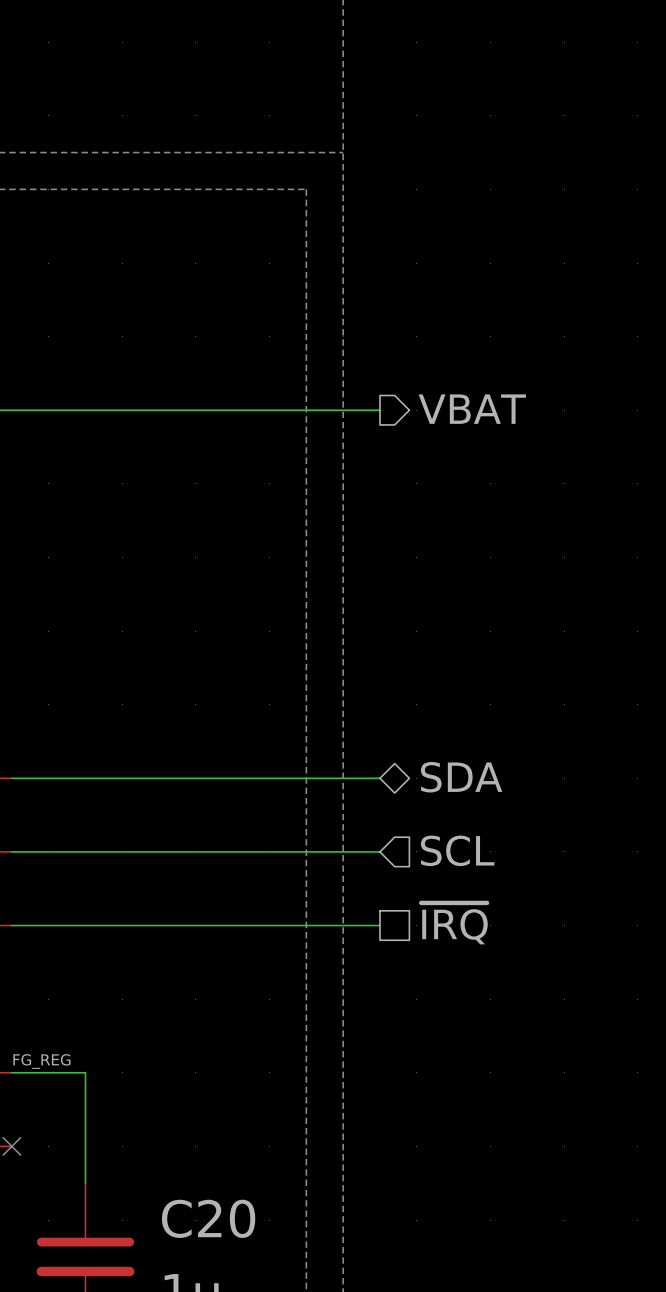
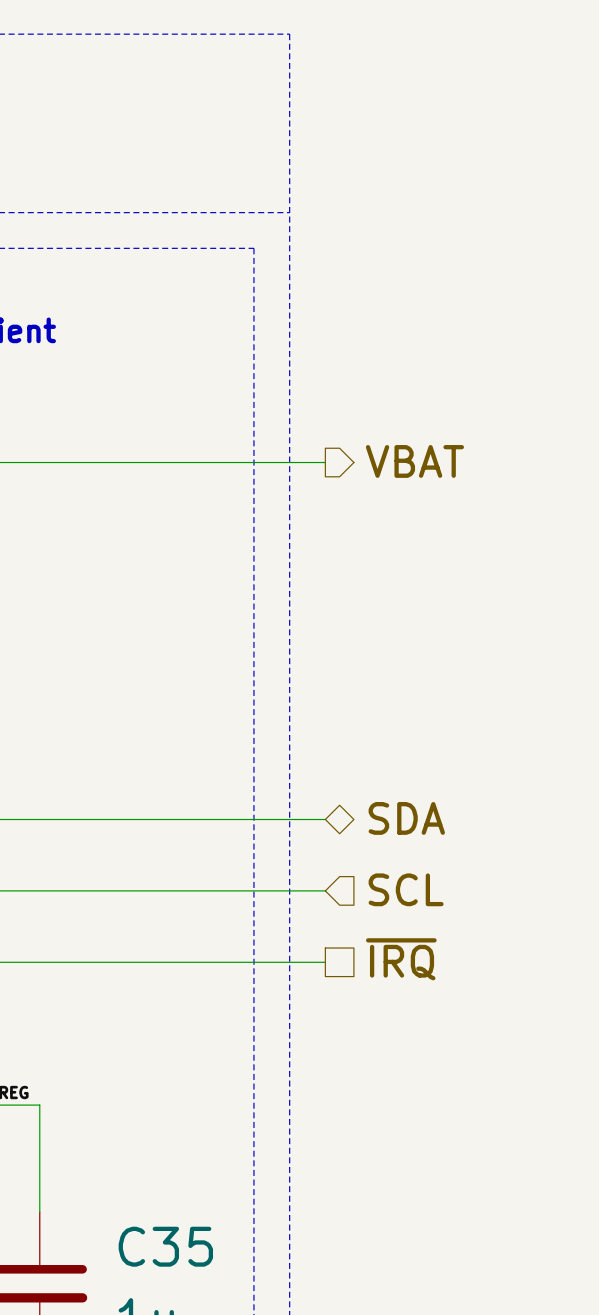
C20 name: C20 (208, 1218) -> C35 (165, 1246)

